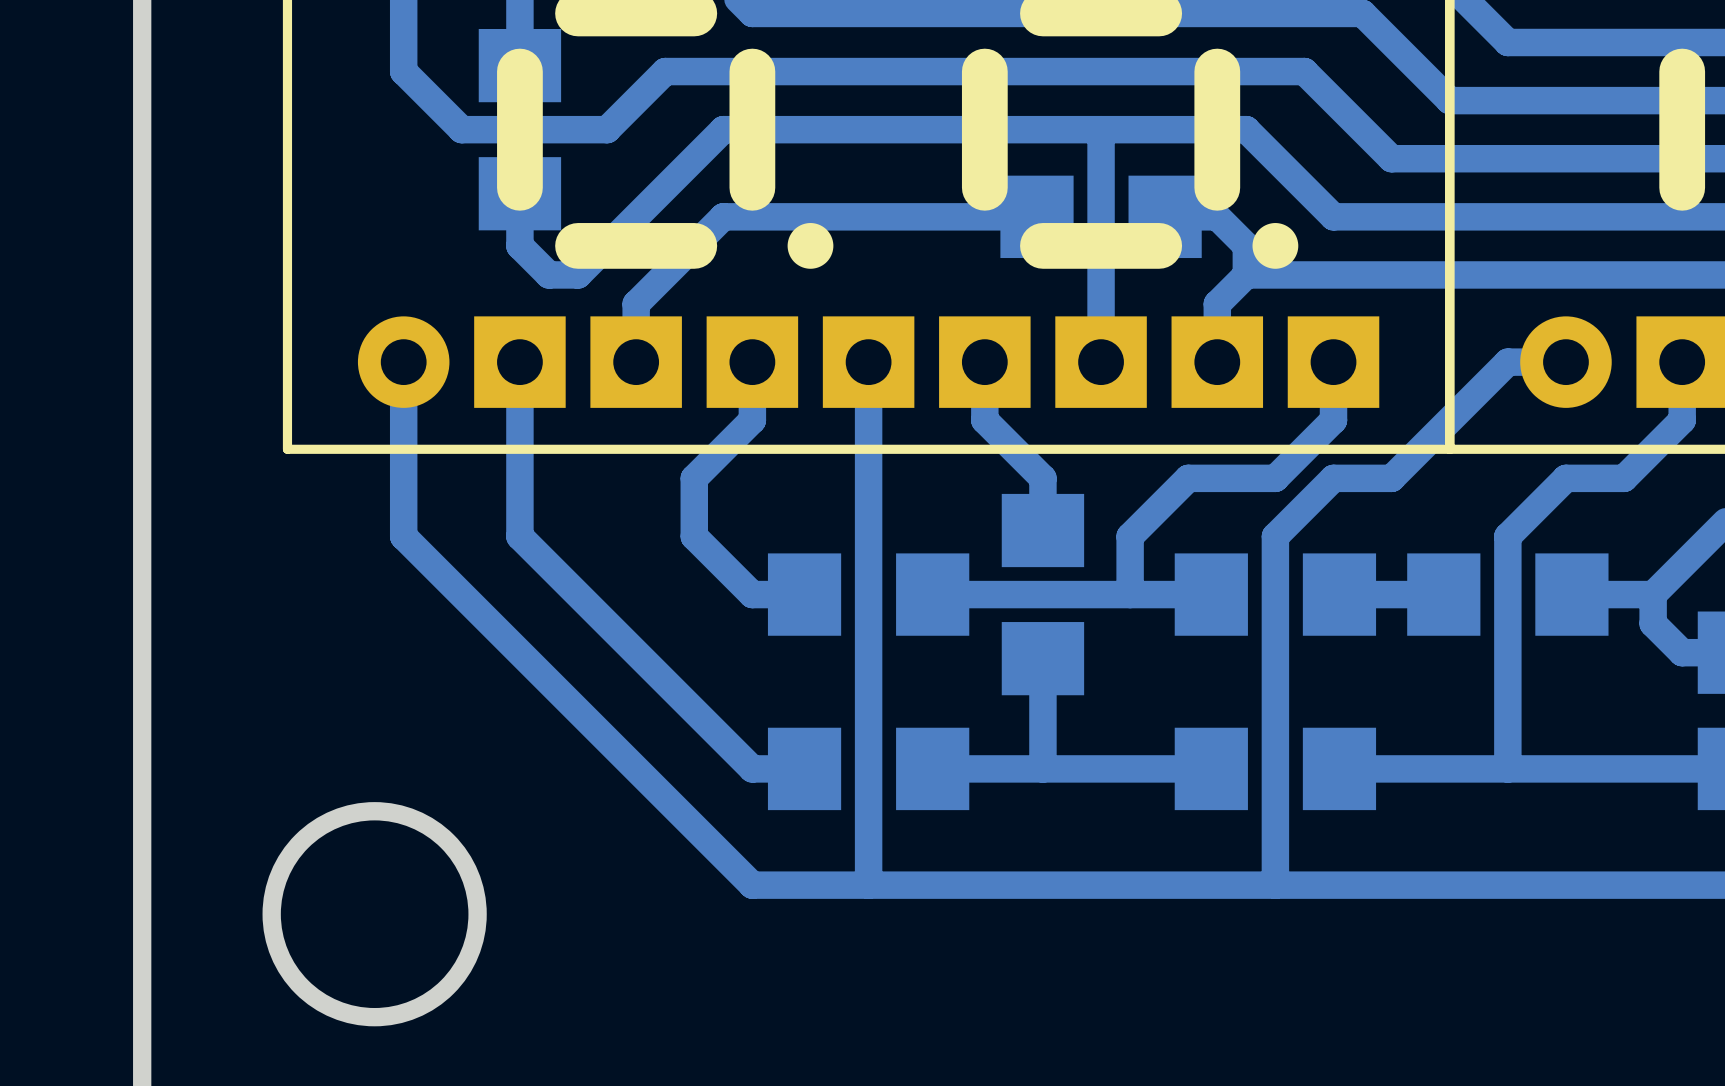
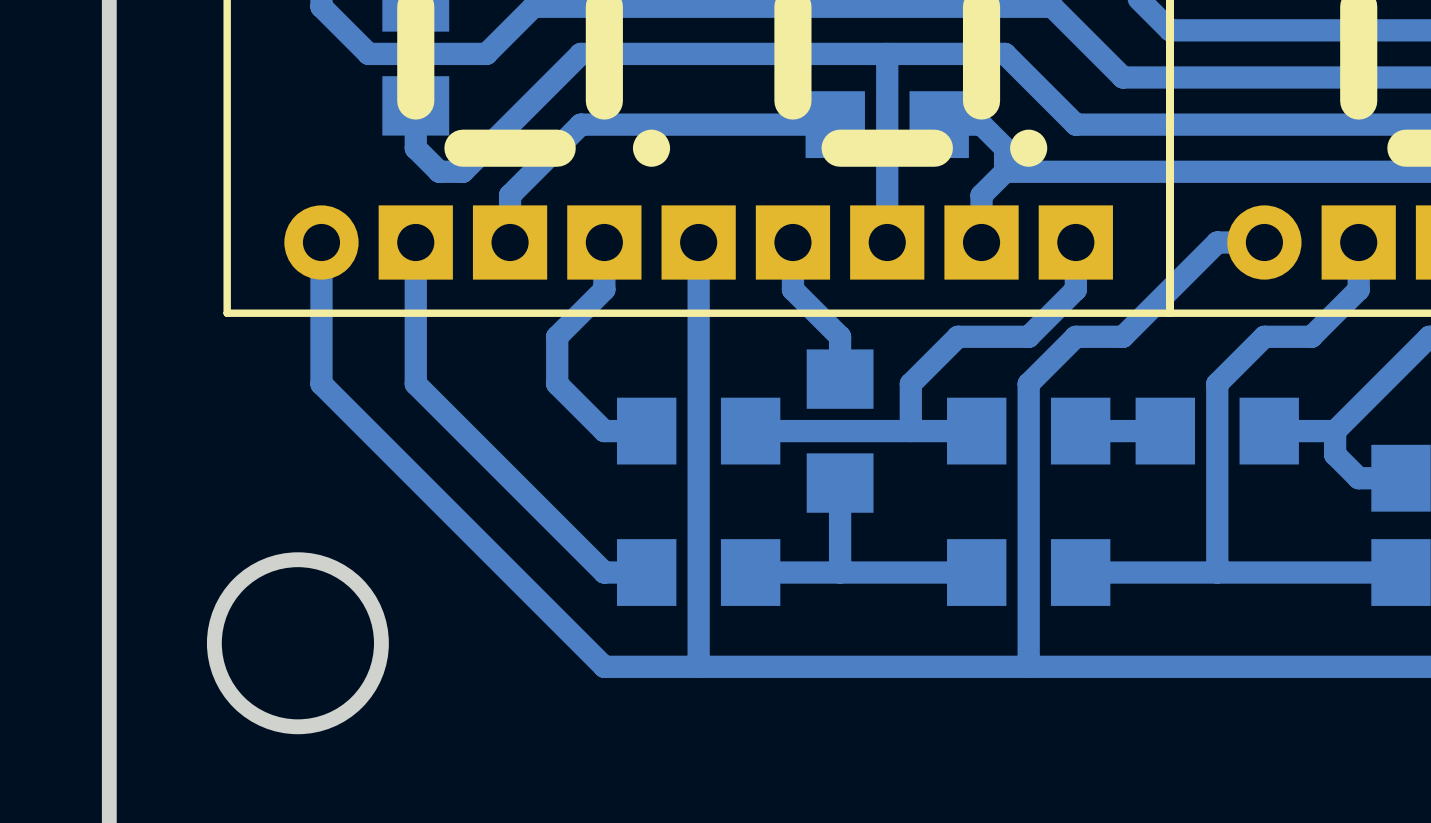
round board edge position: (374, 914) -> (297, 643)

